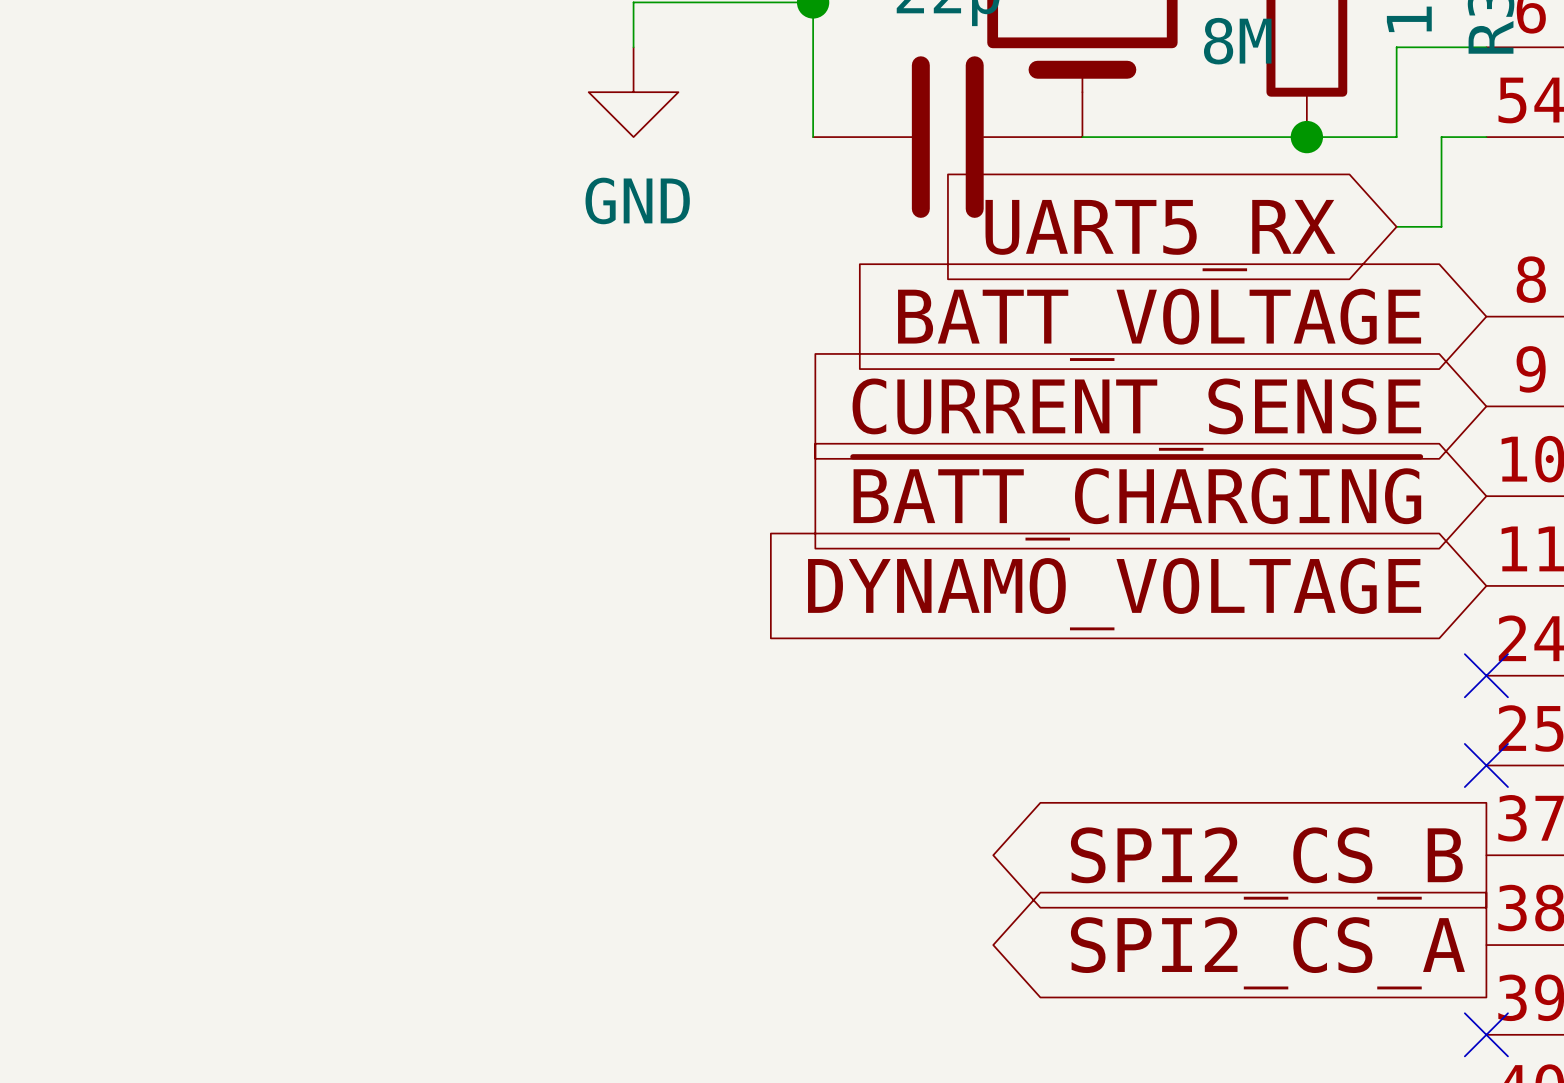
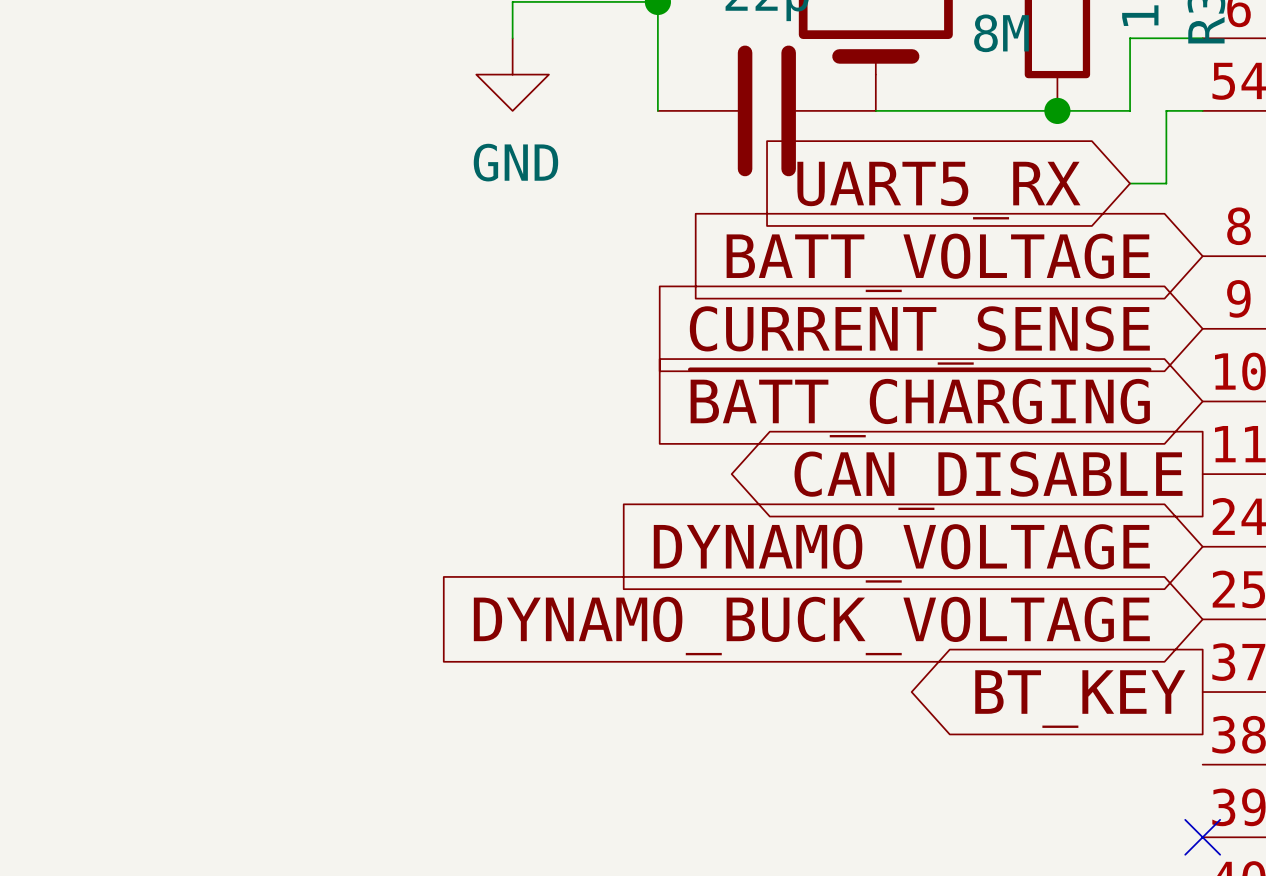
global label shape: input (1114, 594) -> output (988, 480)
global label: DYNAMO_VOLTAGE (1114, 594) -> CAN_DISABLE (988, 480)
no-connect mark: (1486, 675) -> none
global label: none -> DYNAMO_VOLTAGE (901, 553)
no-connect mark: (1486, 765) -> none
global label: none -> DYNAMO_BUCK_VOLTAGE (811, 626)
global label: SPI2_CS_B (1266, 863) -> BT_KEY (1080, 699)
global label: SPI2_CS_A (1267, 953) -> none

